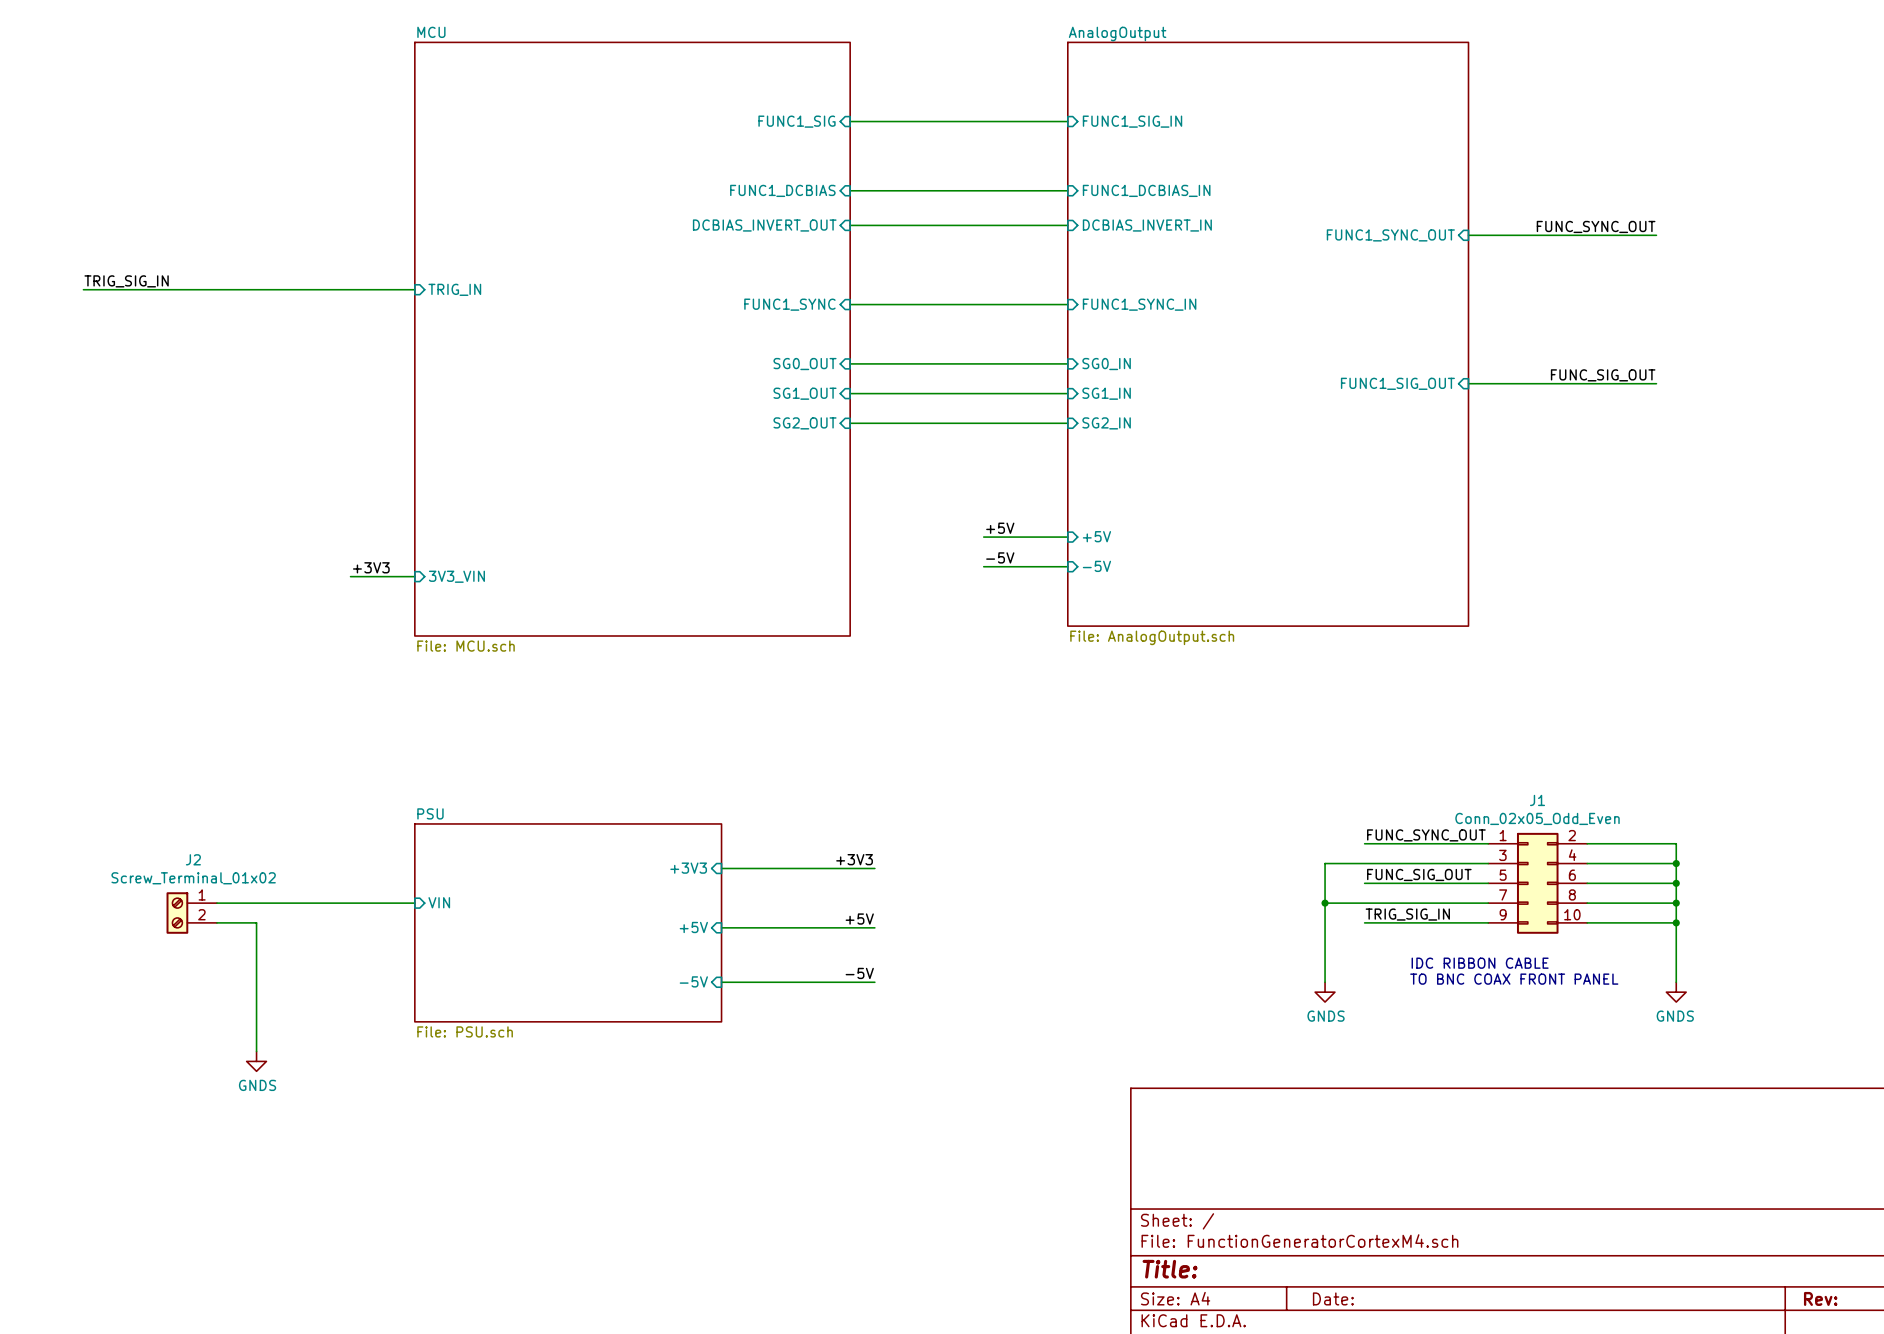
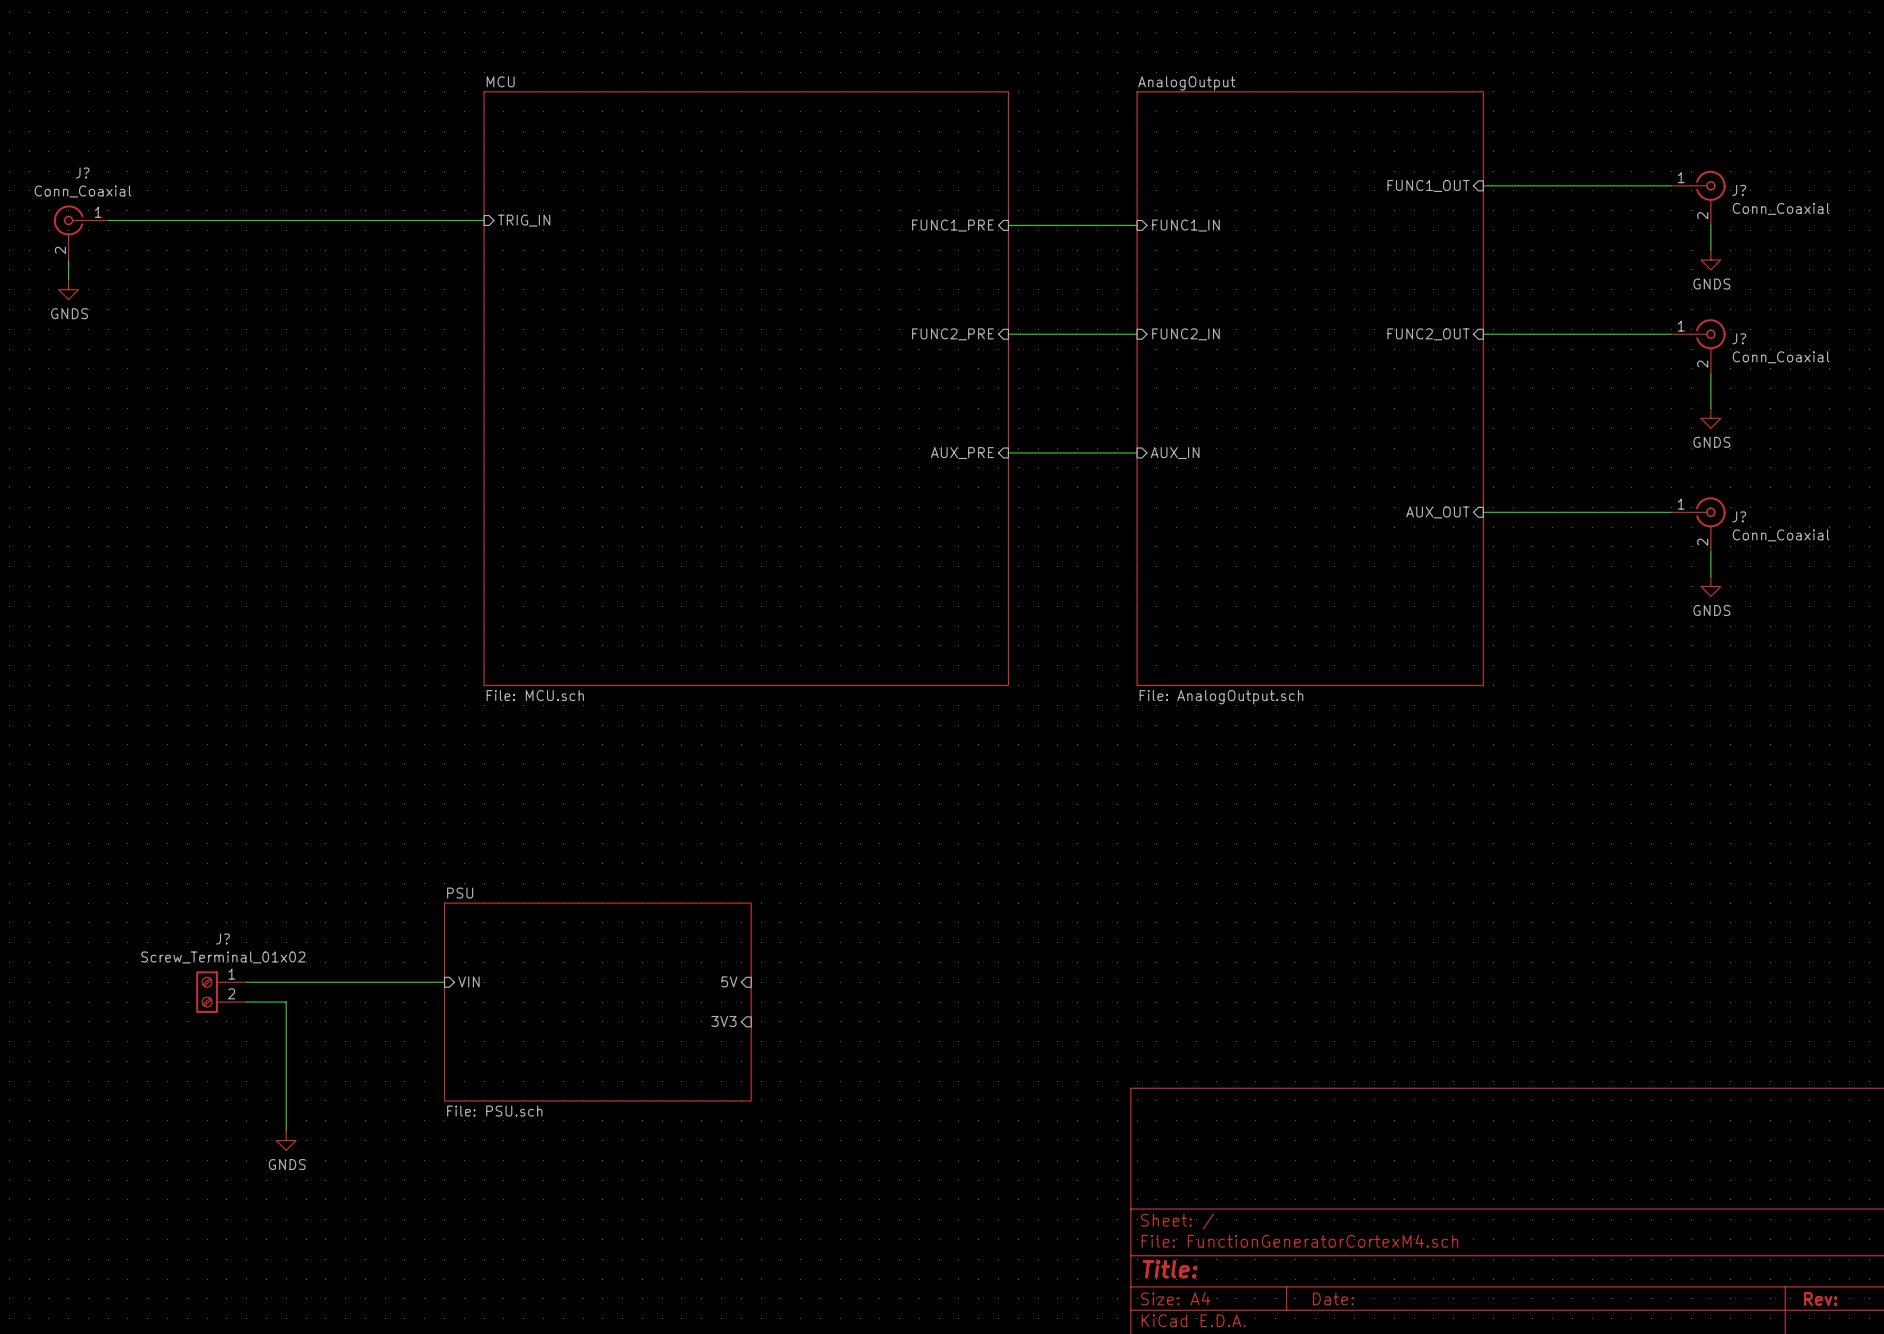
sheet pin: FUNC1_SIG (797, 121) -> none
wire: (850, 121) (1067, 121) -> none
sheet pin: FUNC1_SIG_IN (1132, 121) -> none
sheet pin: none -> FUNC1_OUT (1428, 185)
sheet pin: FUNC1_DCBIAS (782, 190) -> none
wire: (850, 190) (1067, 190) -> none
sheet pin: FUNC1_DCBIAS_IN (1146, 190) -> none
J?: none -> Conn_Coaxial (1698, 198)
wire: none -> (108, 220) (484, 220)
sheet pin: DCBIAS_INVERT_OUT (764, 225) -> none
wire: (850, 225) (1008, 225) -> none
sheet pin: none -> FUNC1_PRE (952, 225)
wire: none -> (1067, 225) (1137, 225)
sheet pin: DCBIAS_INVERT_IN (1147, 225) -> none
sheet pin: none -> FUNC1_IN (1185, 225)
wire: none -> (1710, 225) (1710, 250)
label: FUNC_SYNC_OUT (1596, 226) -> none
J?: none -> Conn_Coaxial (80, 232)
sheet pin: FUNC1_SYNC_OUT (1390, 235) -> none
wire: (1468, 235) (1656, 235) -> (1483, 185) (1671, 185)
wire: none -> (68, 260) (68, 279)
power symbol: none -> GNDS (1710, 260)
label: TRIG_SIG_IN (126, 281) -> none
power symbol: none -> GNDS (68, 289)
wire: (83, 289) (414, 289) -> none
sheet pin position: TRIG_IN (454, 289) -> TRIG_IN (524, 220)
sheet pin: FUNC1_SYNC (789, 304) -> none
wire: (850, 304) (1067, 304) -> none
sheet pin: FUNC1_SYNC_IN (1139, 304) -> none
sheet pin: none -> FUNC2_PRE (952, 334)
wire: none -> (1008, 334) (1137, 334)
sheet pin: none -> FUNC2_IN (1185, 334)
sheet AnalogOutput: File: AnalogOutput.sch (1268, 334) -> none
sheet pin: none -> FUNC2_OUT (1428, 334)
sheet MCU: File: MCU.sch (632, 339) -> none
J?: none -> Conn_Coaxial (1698, 346)
wire: (850, 363) (1067, 363) -> none
sheet pin: SG0_OUT (805, 364) -> none
sheet pin: SG0_IN (1106, 364) -> none
wire: none -> (1710, 373) (1710, 408)
label: FUNC_SIG_OUT (1603, 375) -> none
sheet pin: FUNC1_SIG_OUT (1397, 383) -> none
wire: (1468, 383) (1656, 383) -> (1483, 334) (1671, 334)
sheet MCU: none -> File: MCU.sch (746, 388)
sheet AnalogOutput: none -> File: AnalogOutput.sch (1310, 388)
sheet pin: SG1_OUT (805, 393) -> none
wire: (850, 393) (1067, 393) -> none
sheet pin: SG1_IN (1106, 393) -> none
power symbol: none -> GNDS (1710, 418)
sheet pin: SG2_OUT (805, 423) -> none
wire: (850, 423) (1067, 423) -> none
sheet pin: SG2_IN (1106, 423) -> none
wire: none -> (1008, 452) (1137, 452)
sheet pin: none -> AUX_PRE (962, 453)
sheet pin: none -> AUX_IN (1175, 453)
sheet pin: none -> AUX_OUT (1437, 512)
wire: none -> (1483, 512) (1671, 512)
J?: none -> Conn_Coaxial (1698, 524)
label: +5V (1000, 528) -> none
sheet pin: +5V (1096, 536) -> none
wire: (983, 537) (1067, 537) -> none
wire: none -> (1710, 551) (1710, 576)
label: -5V (1000, 557) -> none
wire: (983, 566) (1067, 566) -> none
sheet pin: -5V (1096, 566) -> none
label: +3V3 (371, 567) -> none
wire: (350, 576) (414, 576) -> none
sheet pin: 3V3_VIN (456, 576) -> none
power symbol: none -> GNDS (1710, 586)
label: FUNC_SYNC_OUT (1426, 835) -> none
wire: (1364, 843) (1488, 843) -> none
wire: (1587, 843) (1676, 843) (1676, 982) -> none
label: +3V3 (854, 859) -> none
wire: (1488, 863) (1325, 863) (1325, 982) -> none
wire: (1587, 863) (1676, 863) -> none
junction: (1676, 863) -> none
sheet pin: +3V3 (688, 868) -> none
wire: (721, 868) (874, 868) -> none
label: FUNC_SIG_OUT (1419, 874) -> none
wire: (1364, 883) (1488, 883) -> none
J1: Conn_02x05_Odd_Even (1537, 883) -> none
wire: (1587, 883) (1676, 883) -> none
junction: (1676, 883) -> none
sheet pin position: VIN (439, 902) -> VIN (468, 981)
wire: (216, 903) (414, 903) -> (246, 982) (444, 982)
wire: (1325, 903) (1488, 903) -> none
junction: (1325, 903) -> none
wire: (1587, 903) (1676, 903) -> none
junction: (1676, 903) -> none
J2: Screw_Terminal_01x02 (191, 913) -> none
label: TRIG_SIG_IN (1407, 914) -> none
label: +5V (859, 919) -> none
wire: (216, 922) (256, 922) (256, 1051) -> (246, 1002) (286, 1002) (286, 1130)
sheet PSU position: (568, 922) -> (597, 1002)
wire: (1364, 922) (1488, 922) -> none
wire: (1587, 922) (1676, 922) -> none
junction: (1676, 922) -> none
sheet pin: +5V (693, 927) -> none
wire: (721, 927) (874, 927) -> none
text: IDC RIBBON CABLE (1480, 963) -> none
label: -5V (859, 973) -> none
text: TO BNC COAX FRONT PANEL (1514, 979) -> none
sheet pin: -5V (693, 981) -> none
sheet pin: none -> 5V (729, 981)
wire: (721, 982) (874, 982) -> none
J?: none -> Screw_Terminal_01x02 (221, 992)
power symbol: GNDS (1325, 992) -> none
power symbol: GNDS (1676, 992) -> none
sheet pin: none -> 3V3 (723, 1021)
power symbol position: GNDS (256, 1061) -> GNDS (286, 1140)

